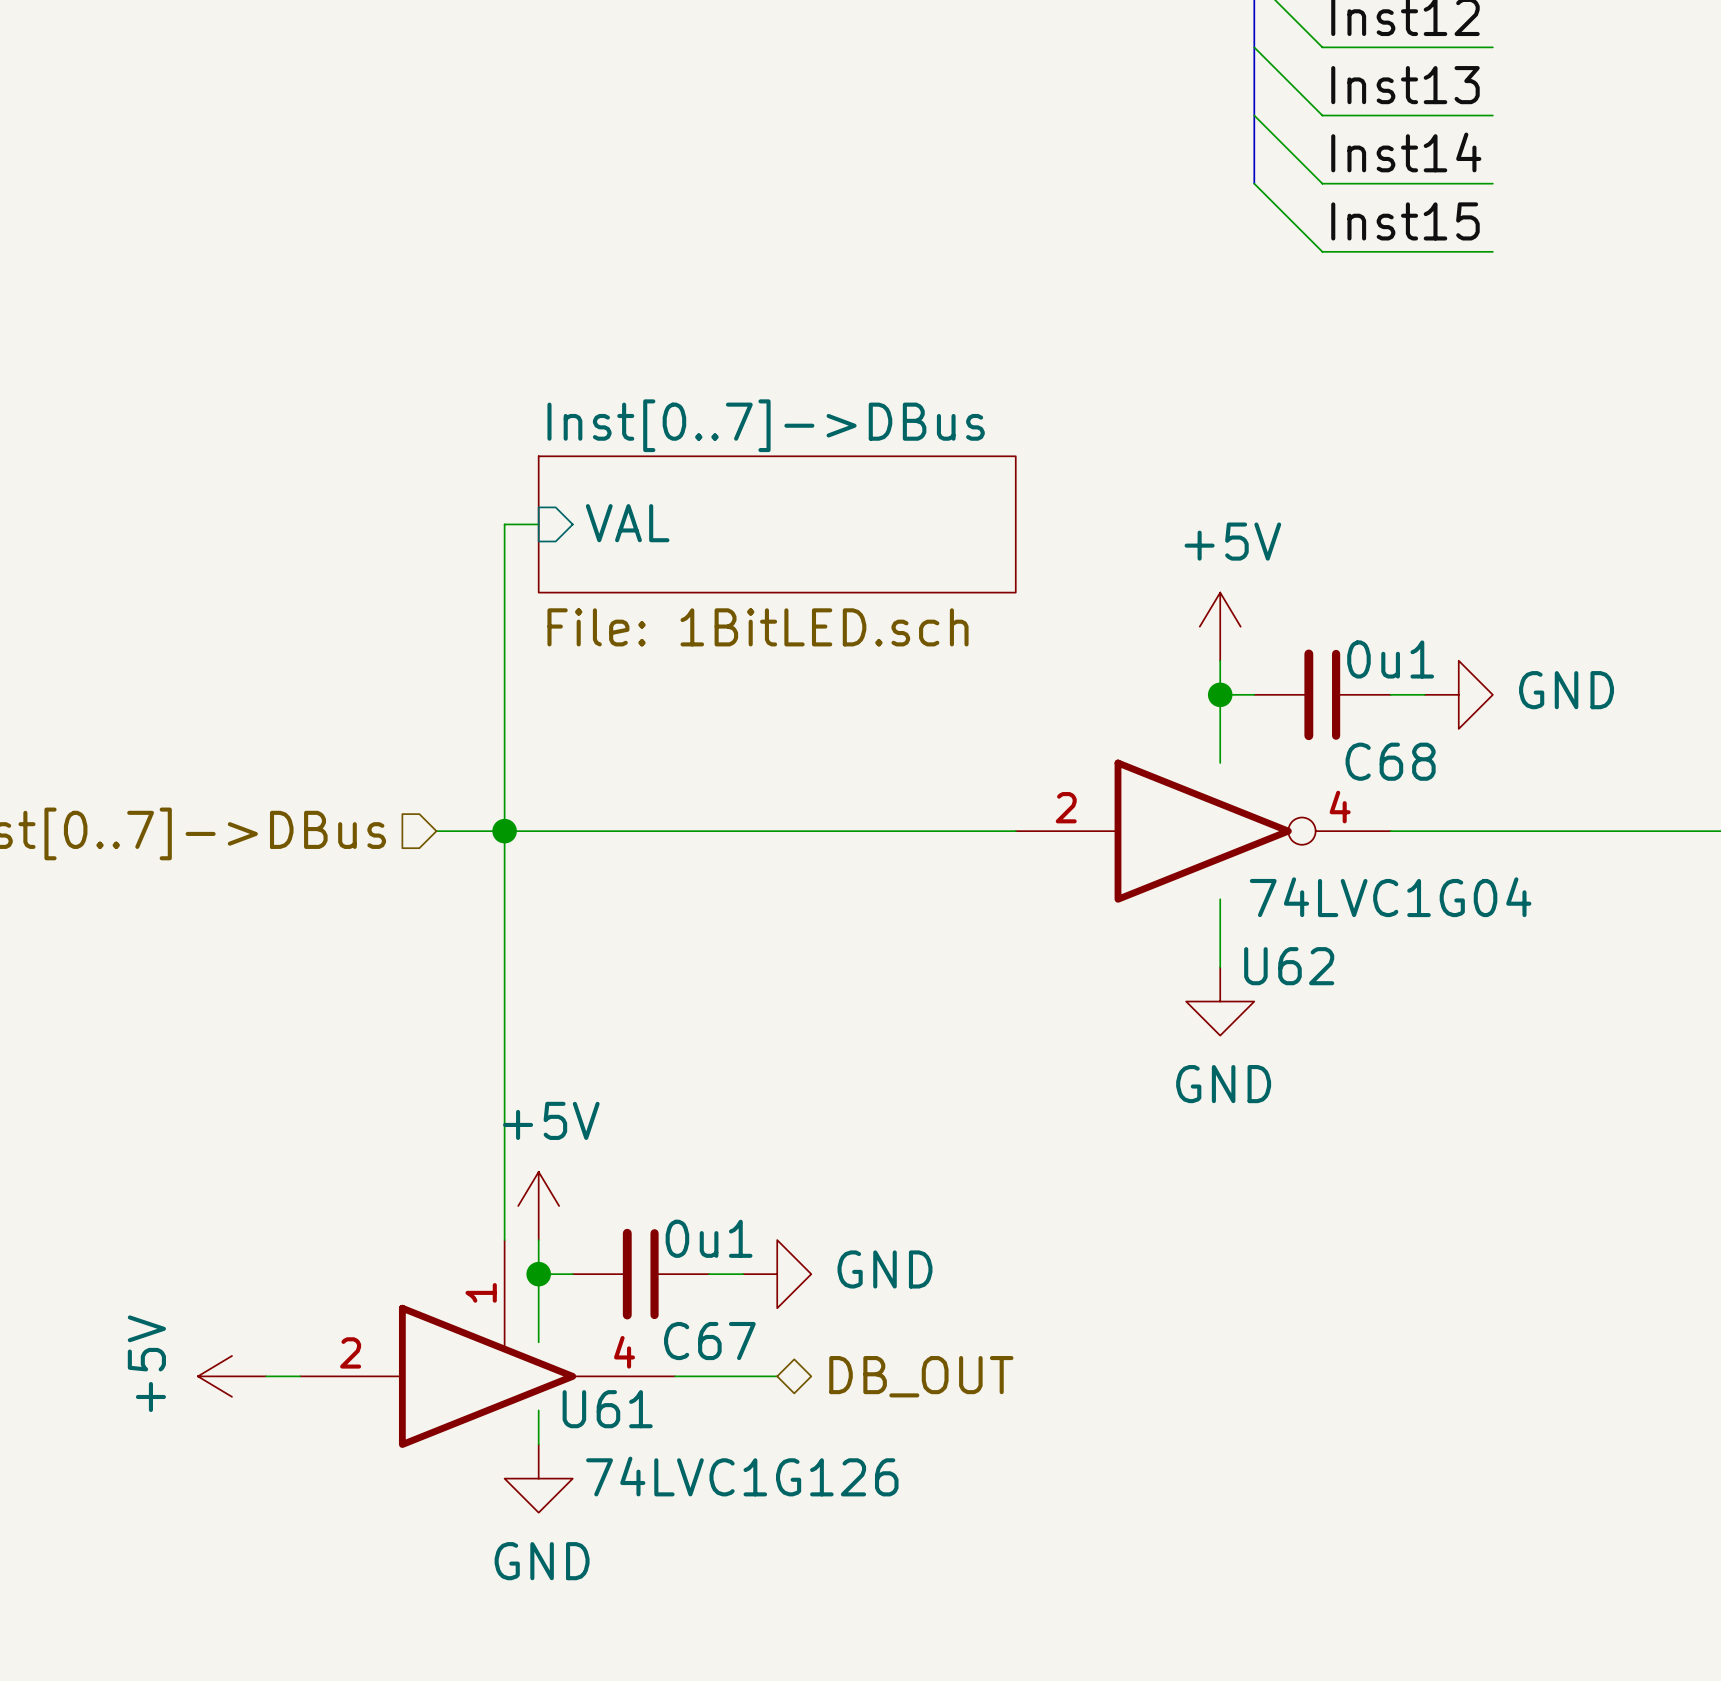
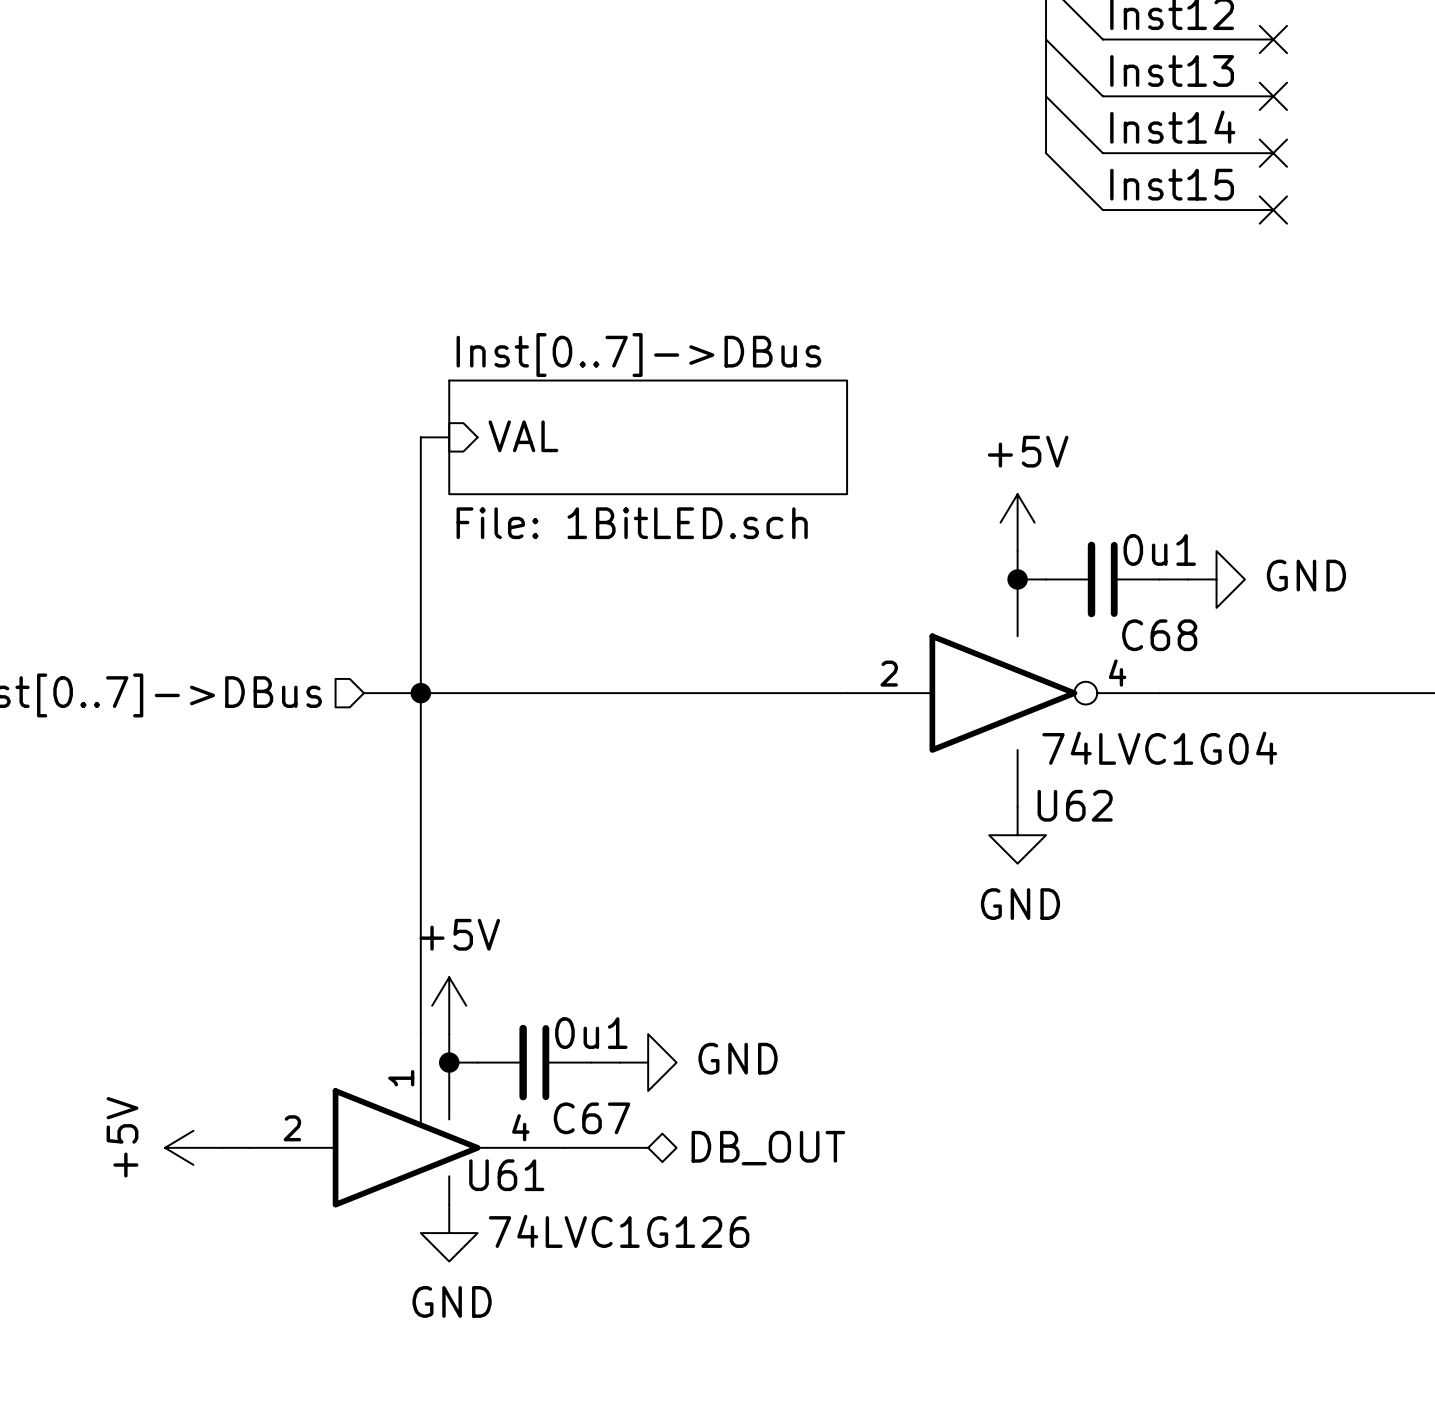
wire: none -> (1244, 39) (1273, 39)
no-connect mark: none -> (1273, 39)
wire: none -> (1244, 96) (1273, 96)
no-connect mark: none -> (1273, 96)
wire: none -> (1244, 153) (1273, 153)
no-connect mark: none -> (1273, 153)
wire: none -> (1244, 210) (1273, 210)
no-connect mark: none -> (1273, 210)

